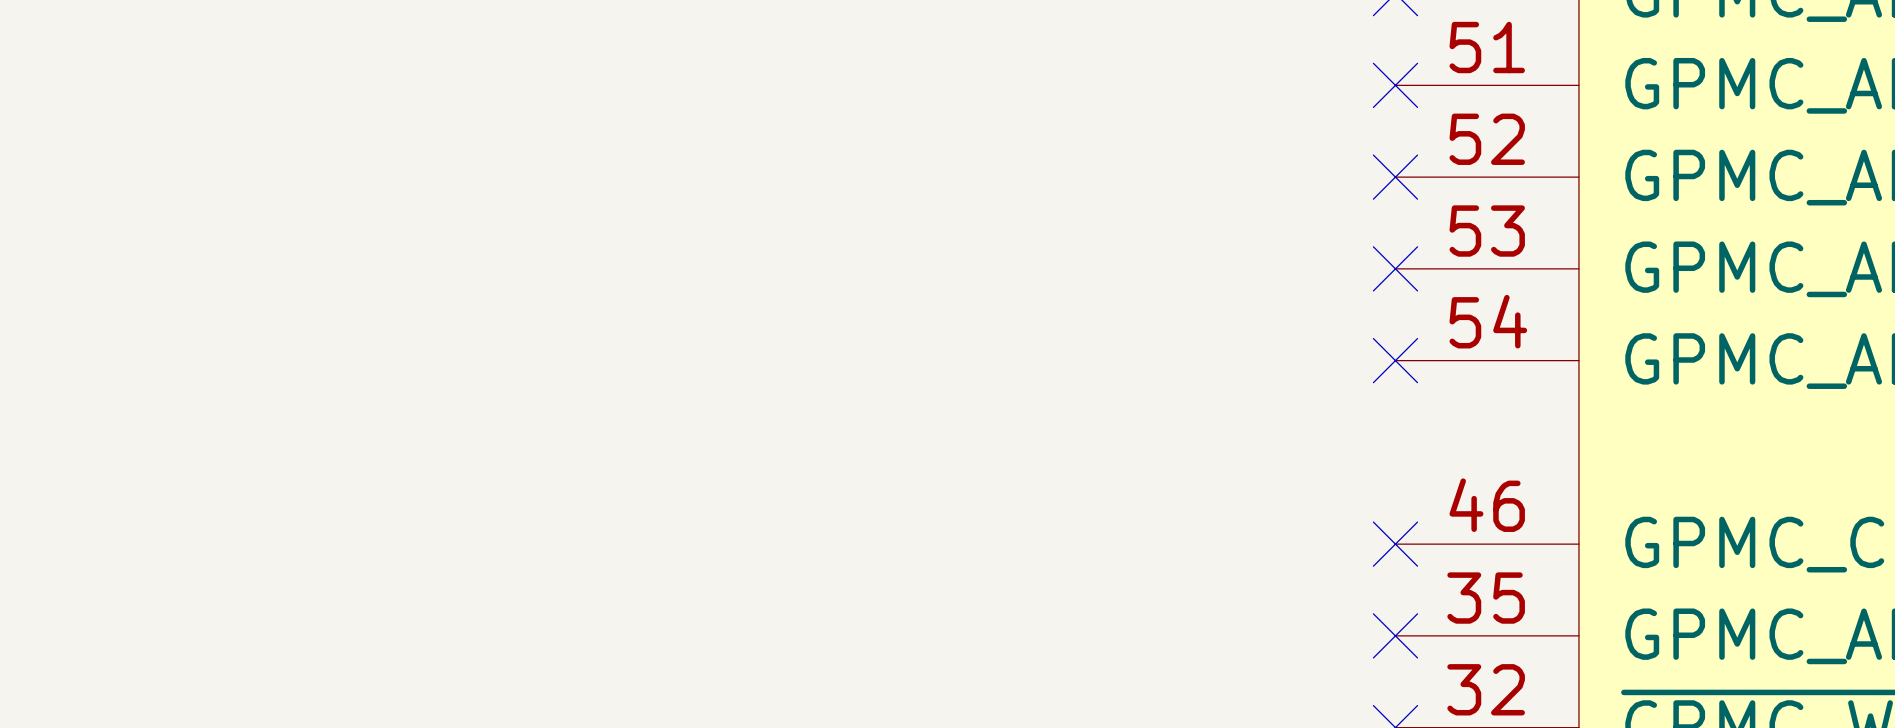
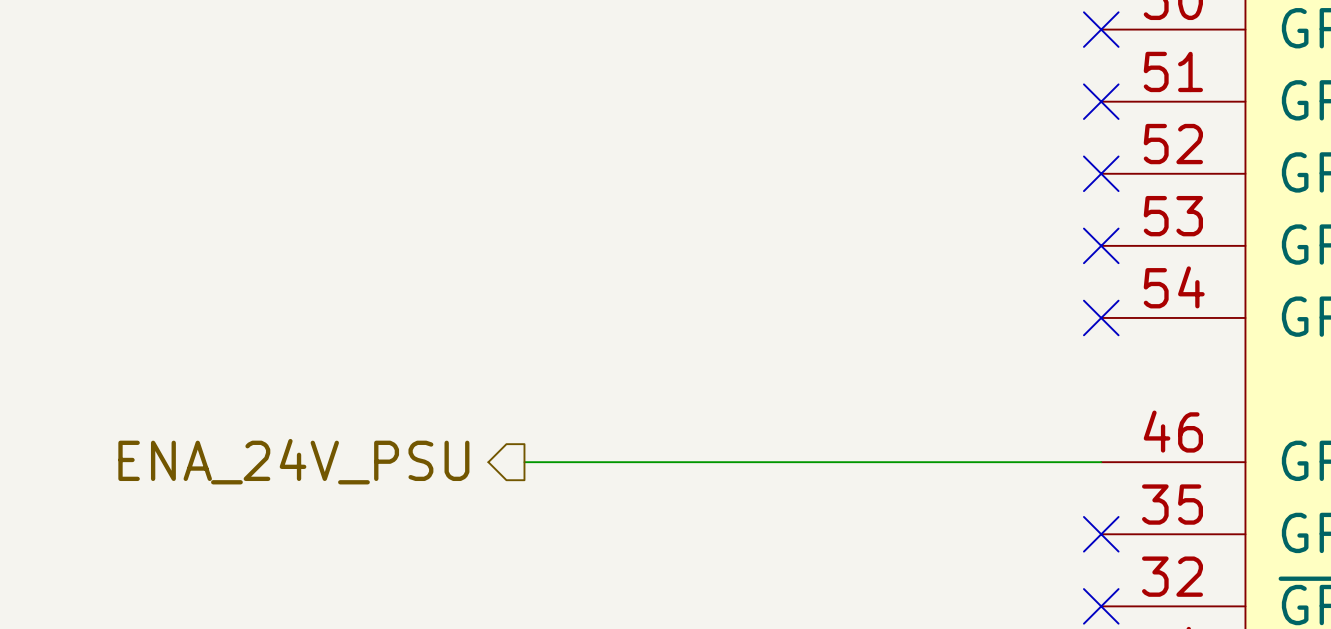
hierarchical label: none -> ENA_24V_PSU (293, 461)
wire: none -> (524, 462) (1101, 462)
no-connect mark: (1395, 544) -> none

